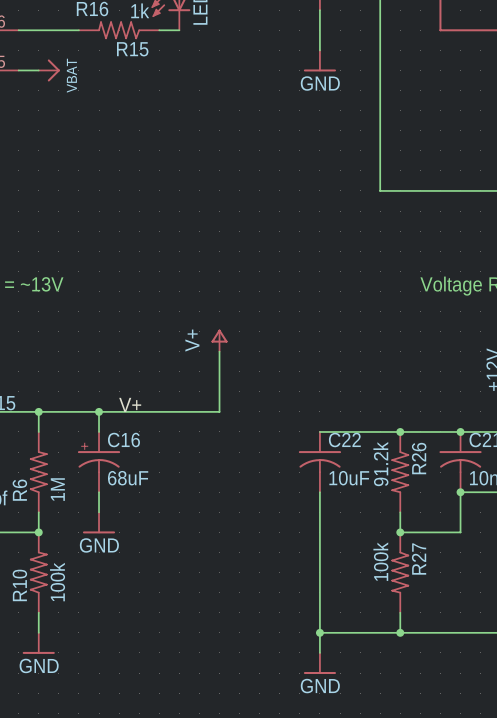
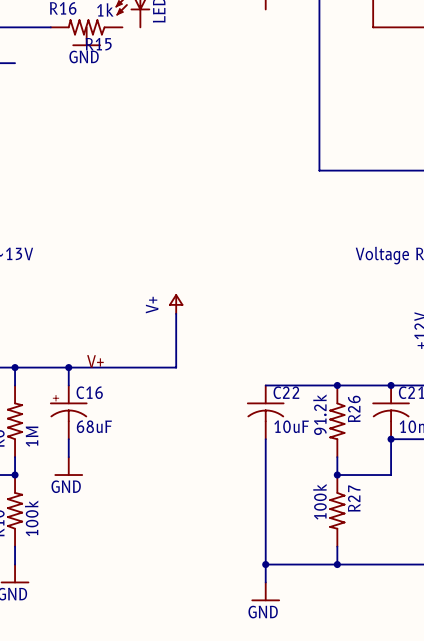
wire: (319, 10) (319, 50) -> none
wire: (159, 30) (179, 30) -> none
power symbol: none -> GND (86, 36)
power symbol: GND (319, 60) -> none
power symbol: VBAT (49, 70) -> none

